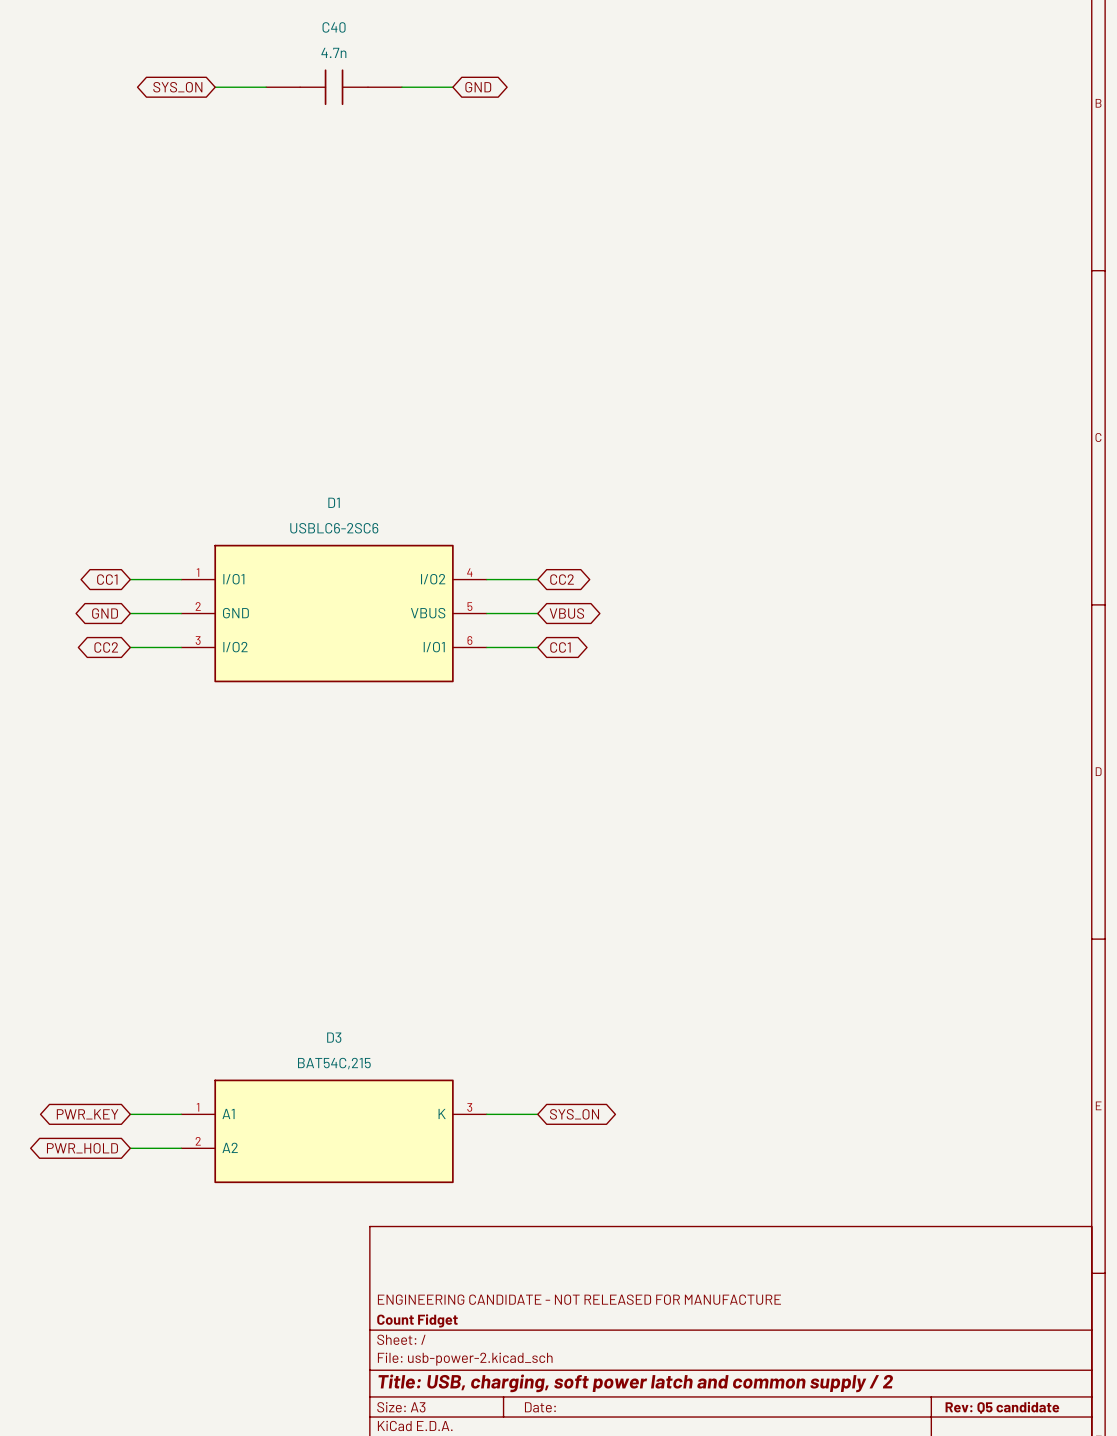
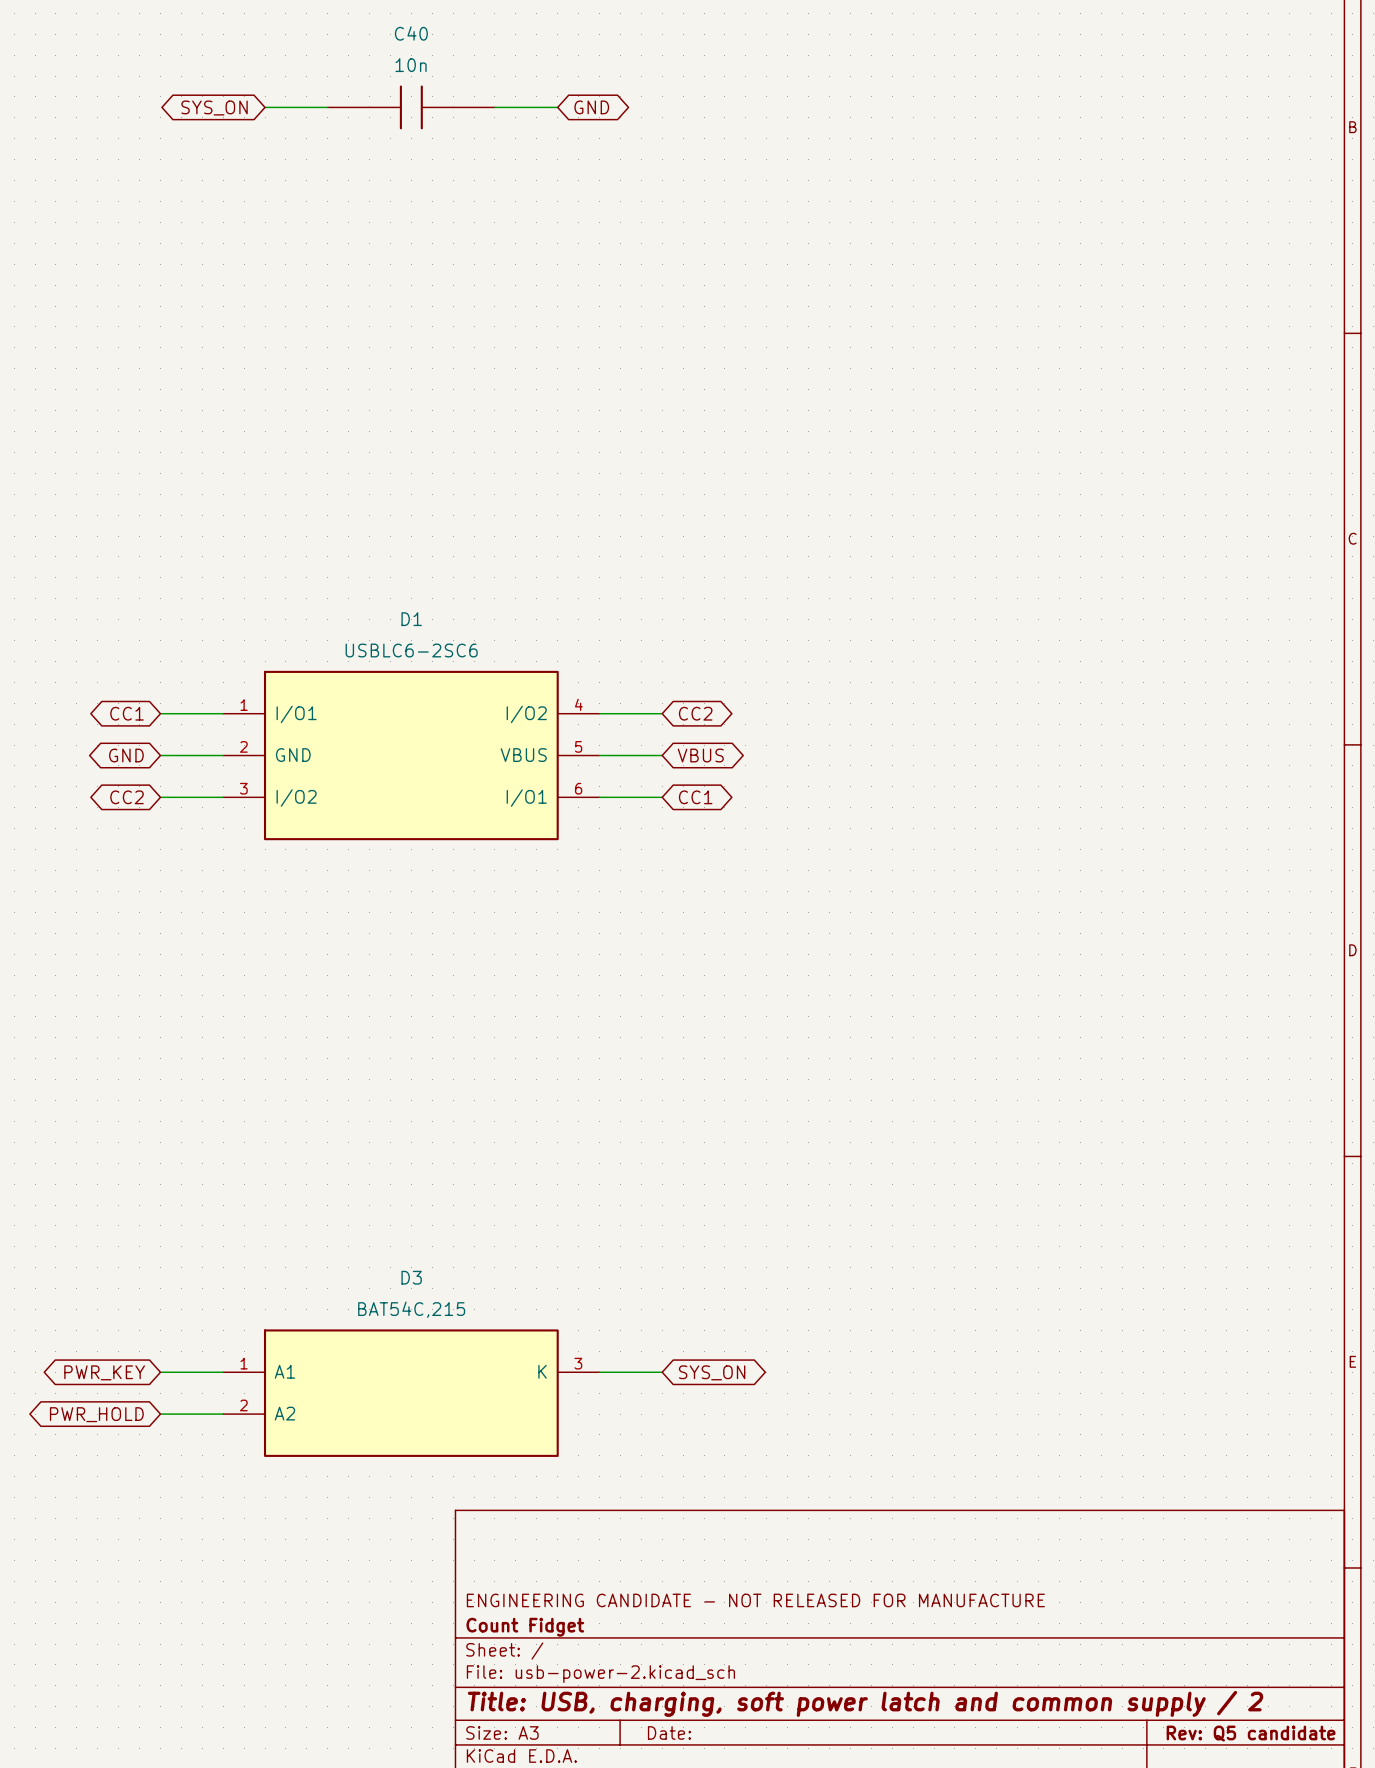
C40 value: 4.7n (333, 52) -> 10n (411, 65)

